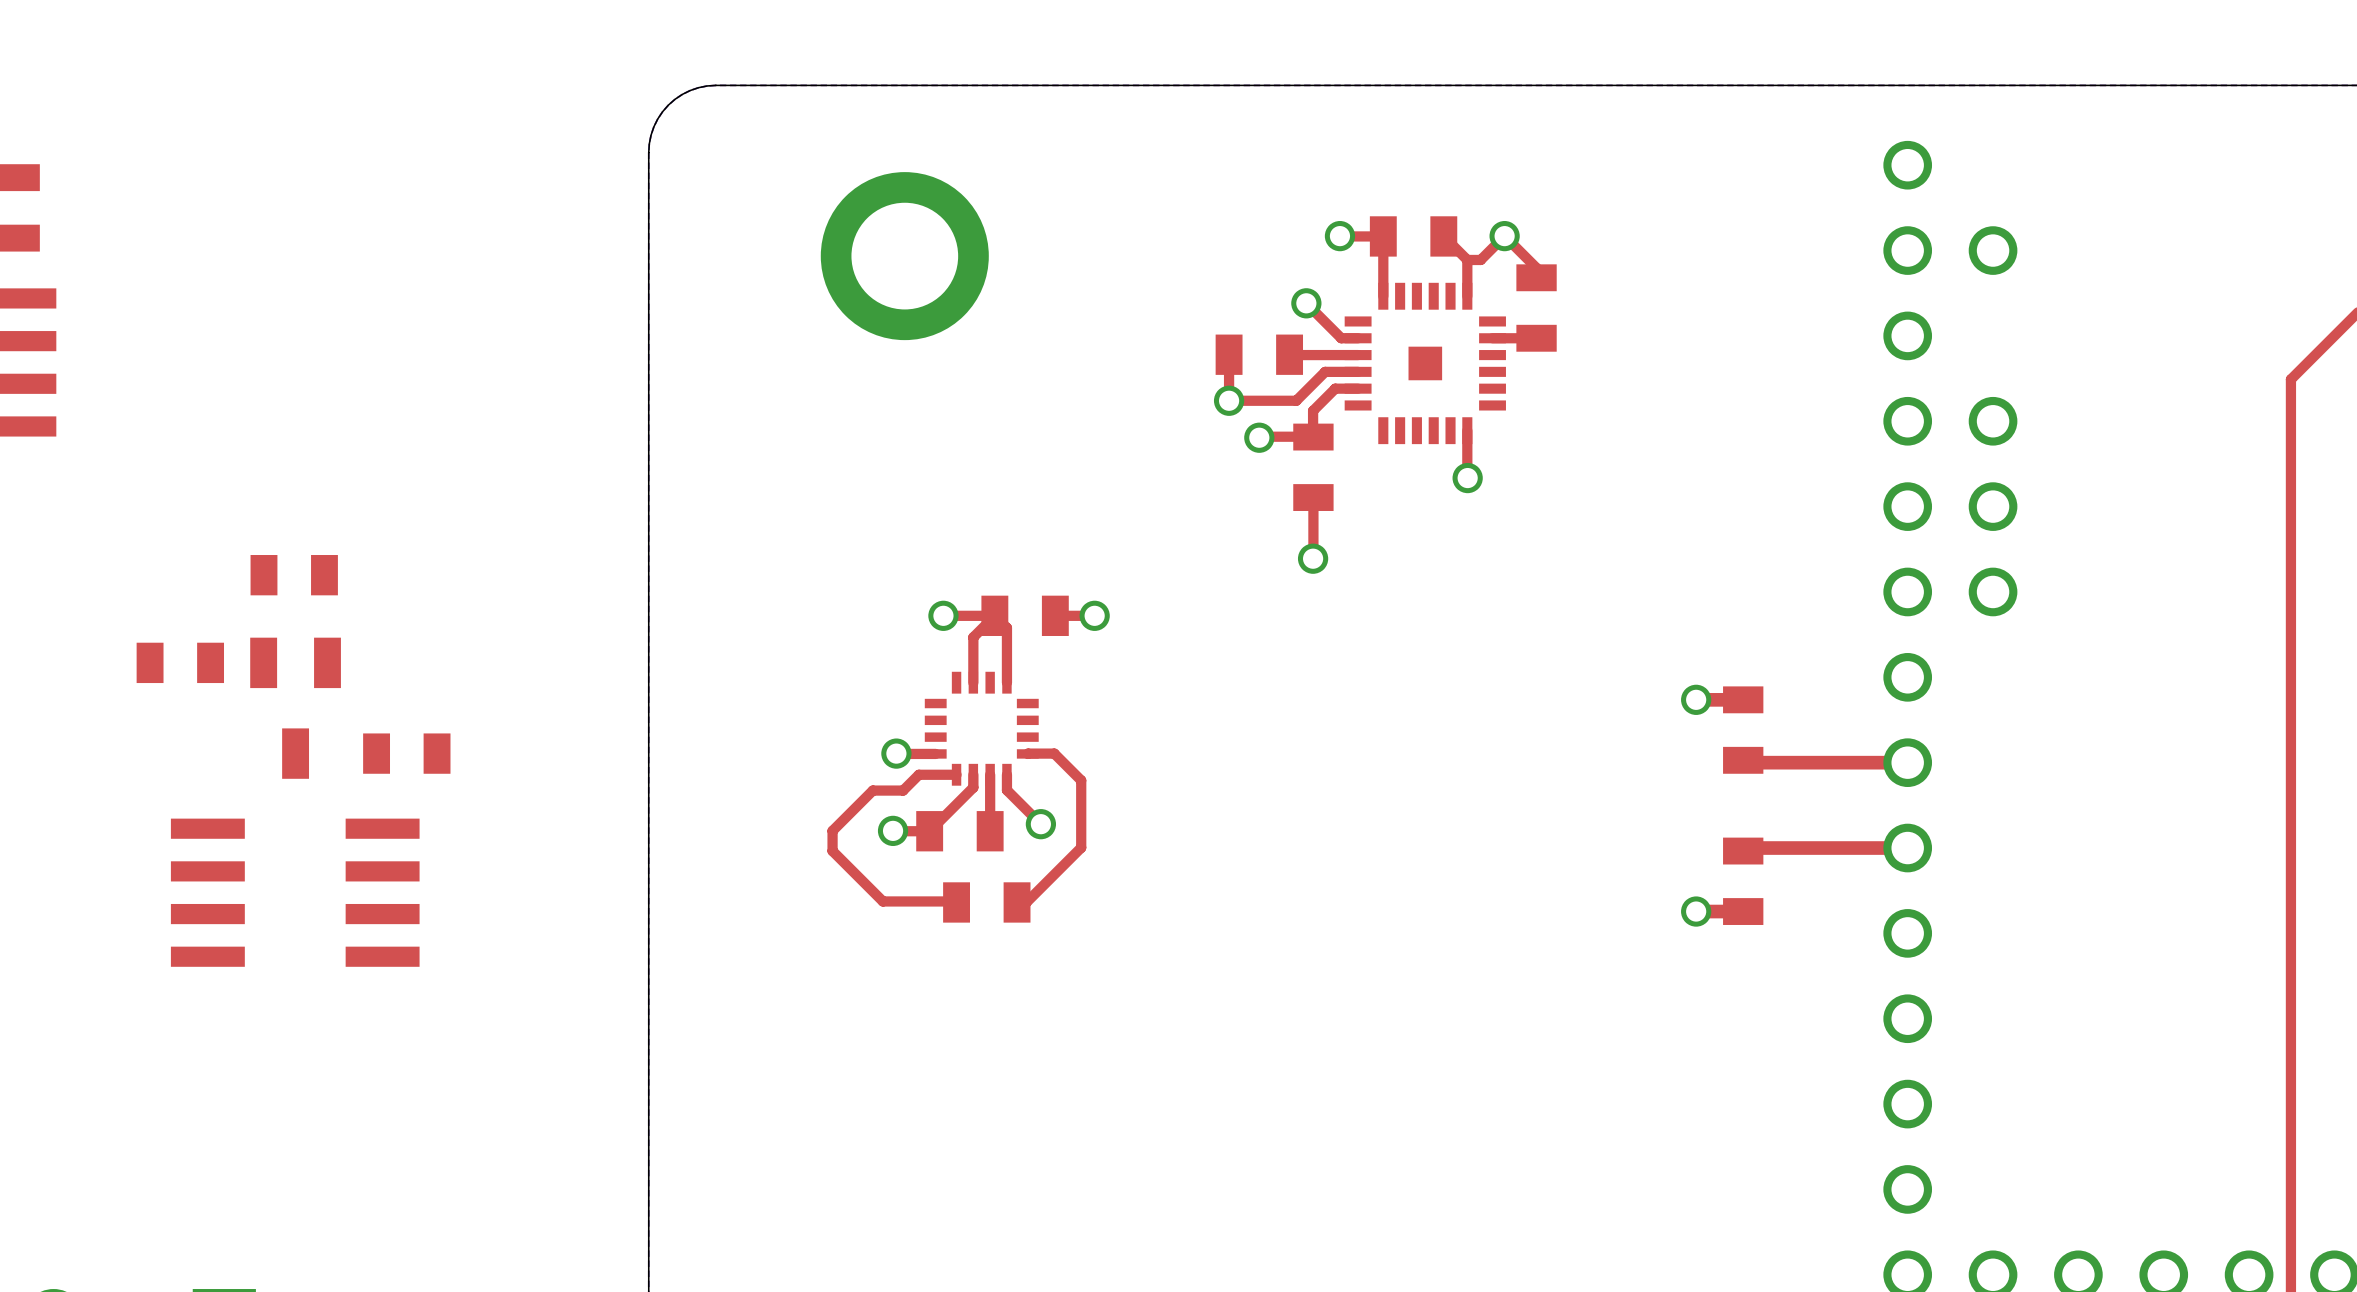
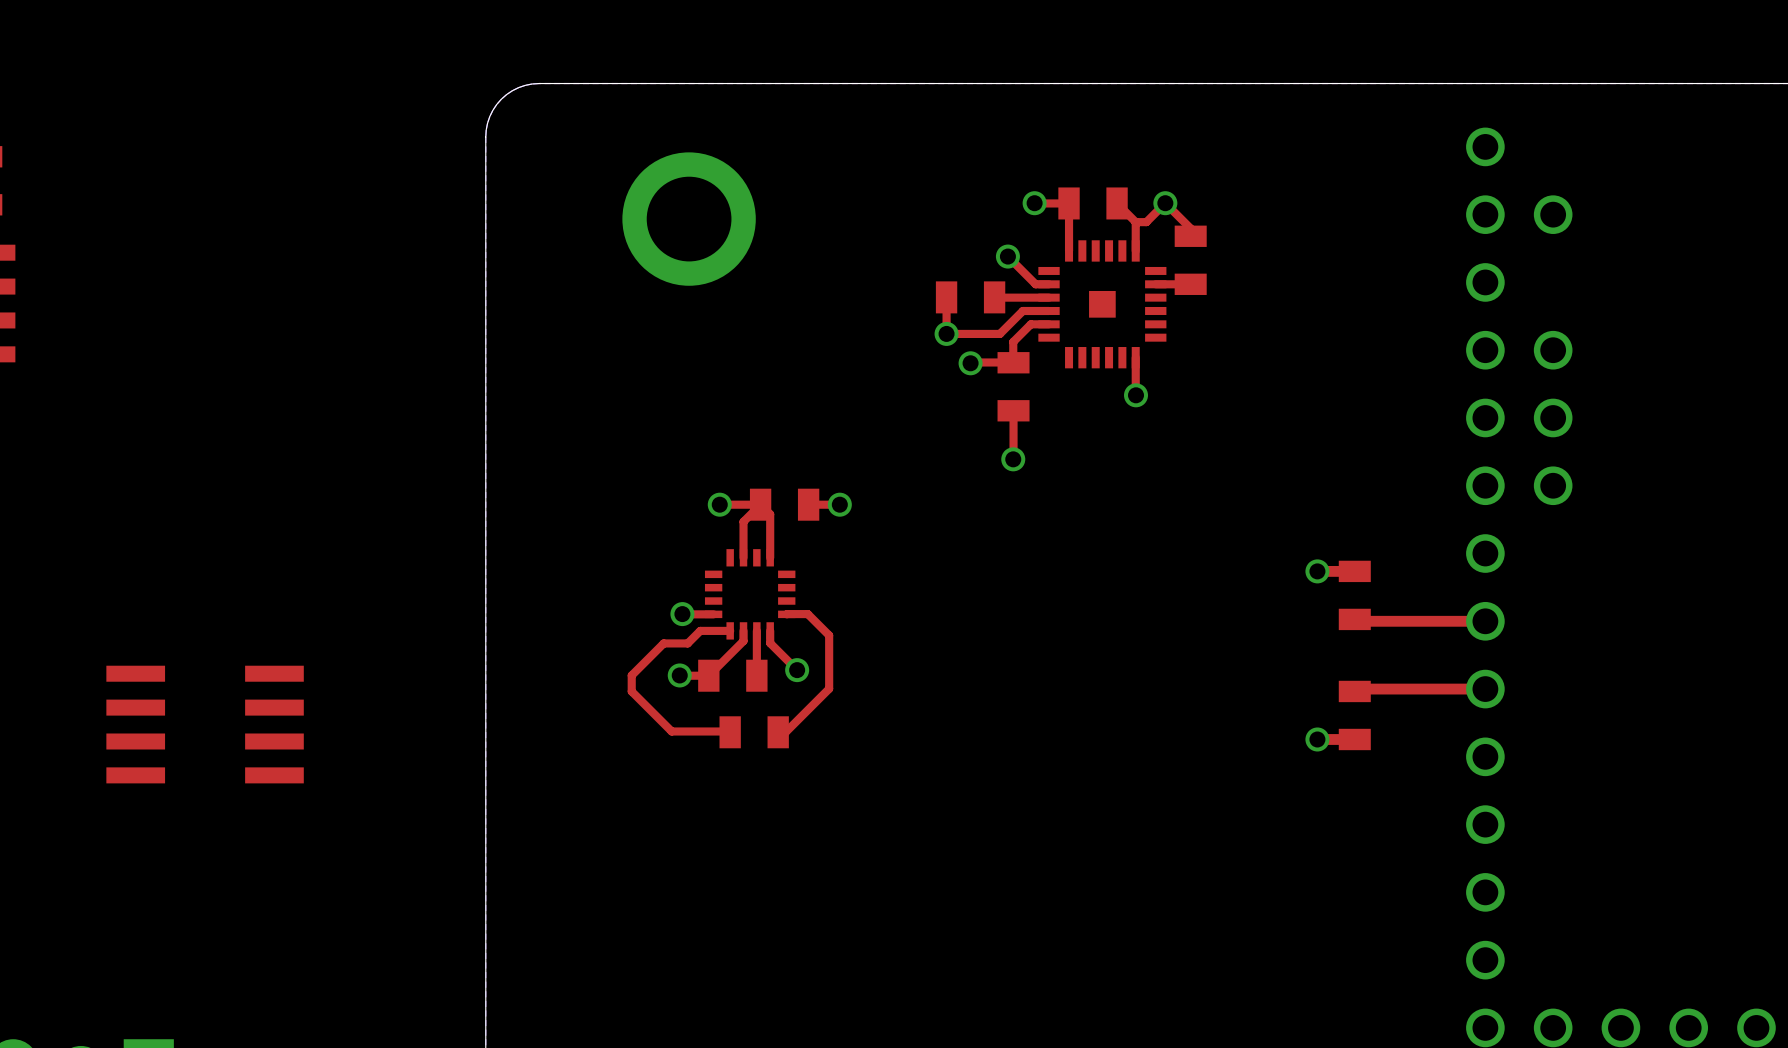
part: (294, 575) -> none
part: (180, 662) -> none
part: (295, 708) -> none
part: (406, 753) -> none

